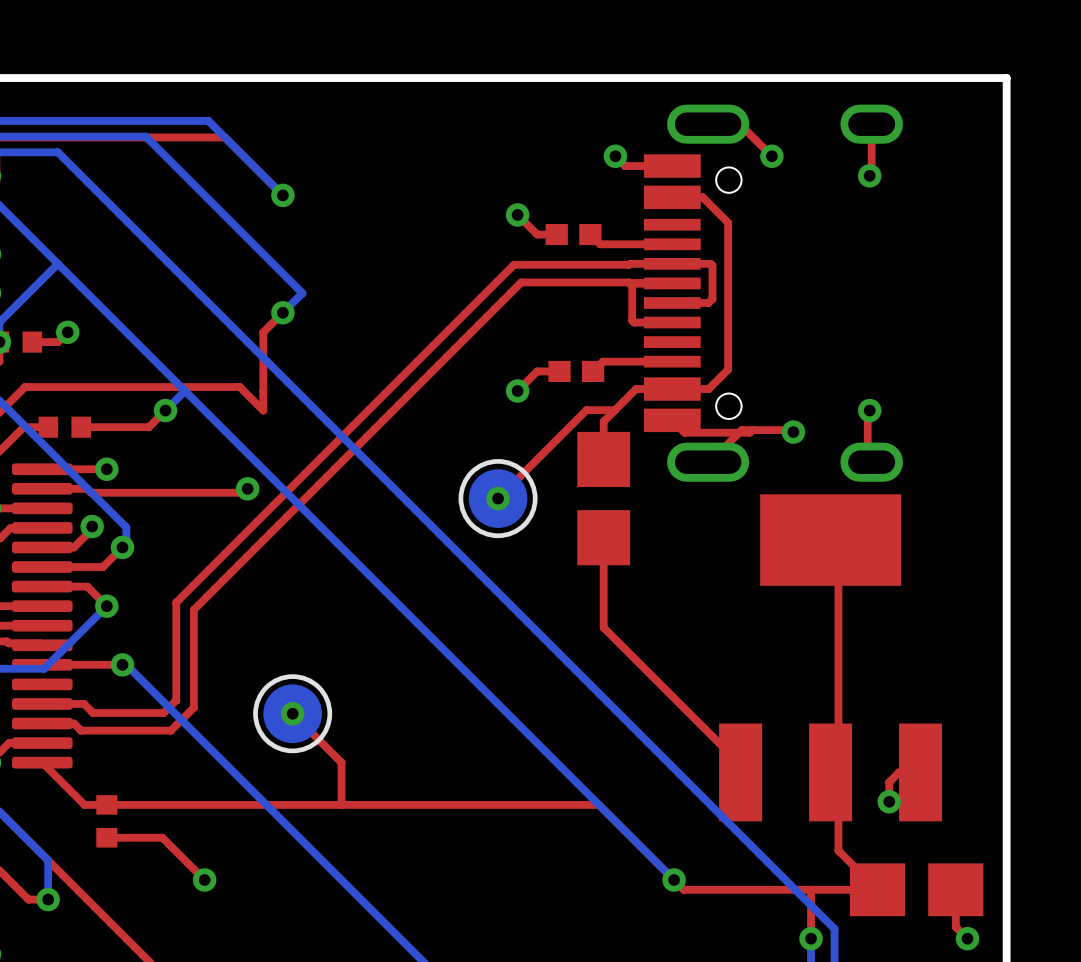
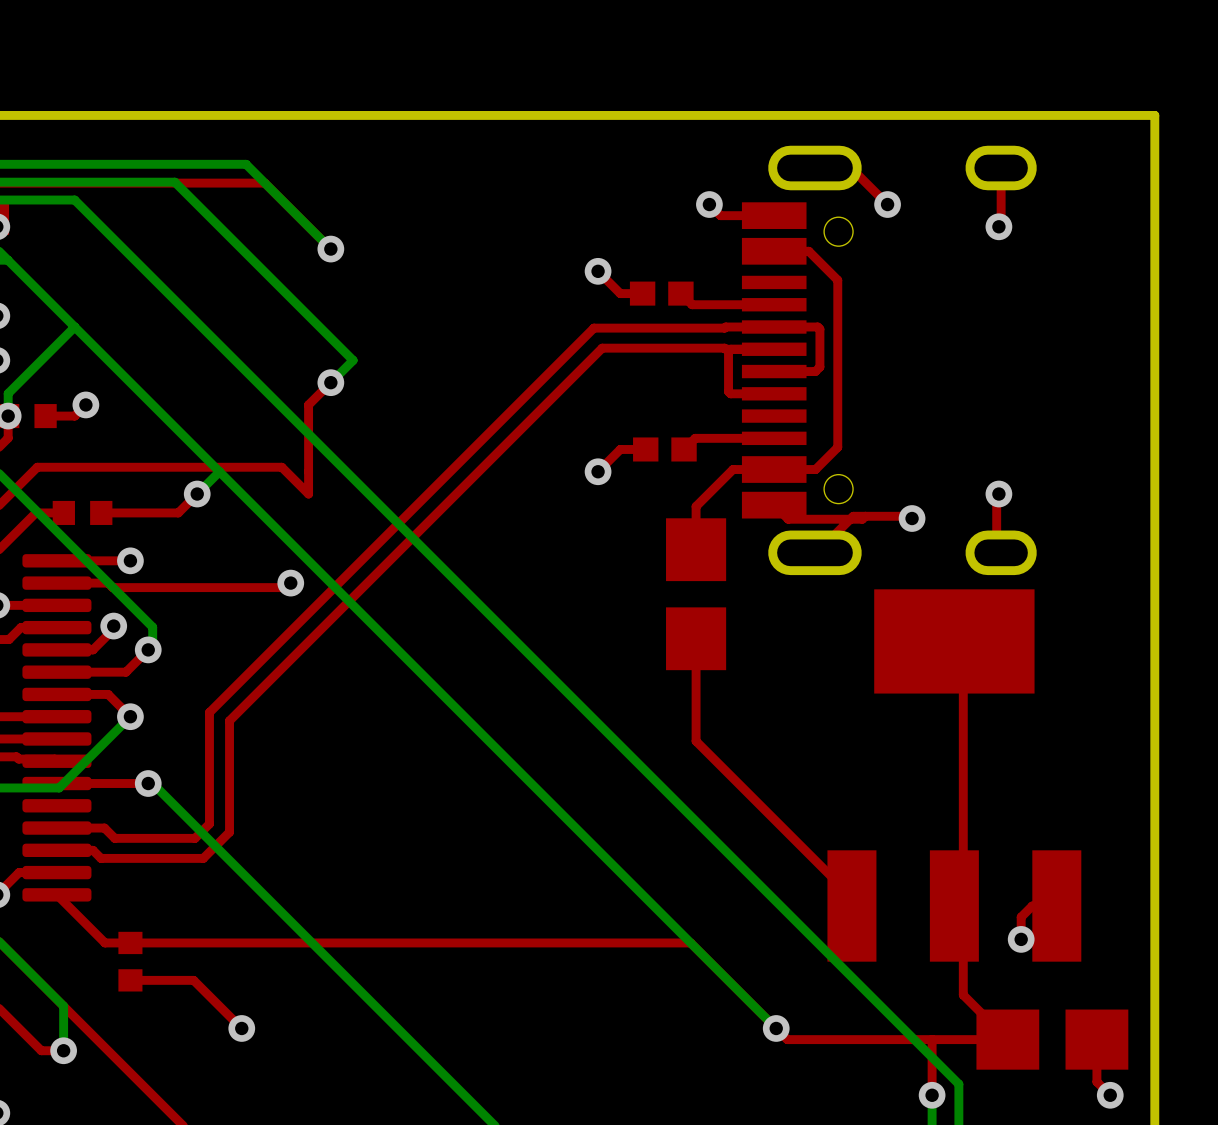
top track: (615, 410) (586, 410) (498, 498) -> none
part: (498, 498) -> none
via: (498, 498) -> none
top track: (292, 713) (341, 762) (341, 804) -> none
part: (292, 713) -> none
via: (292, 713) -> none

